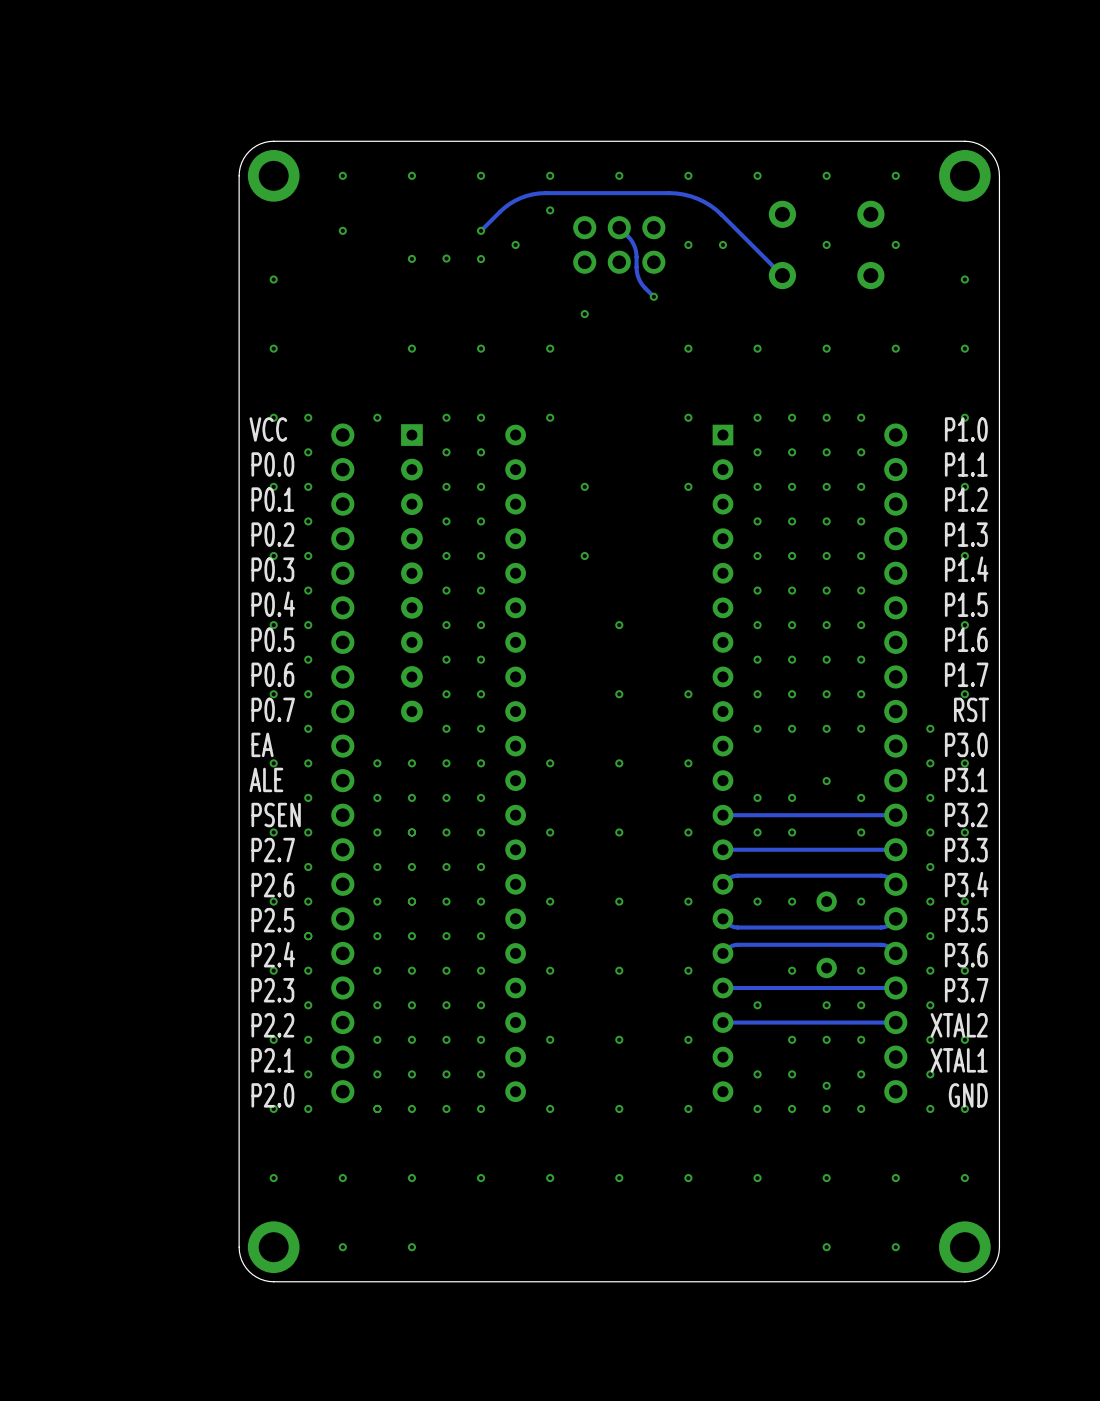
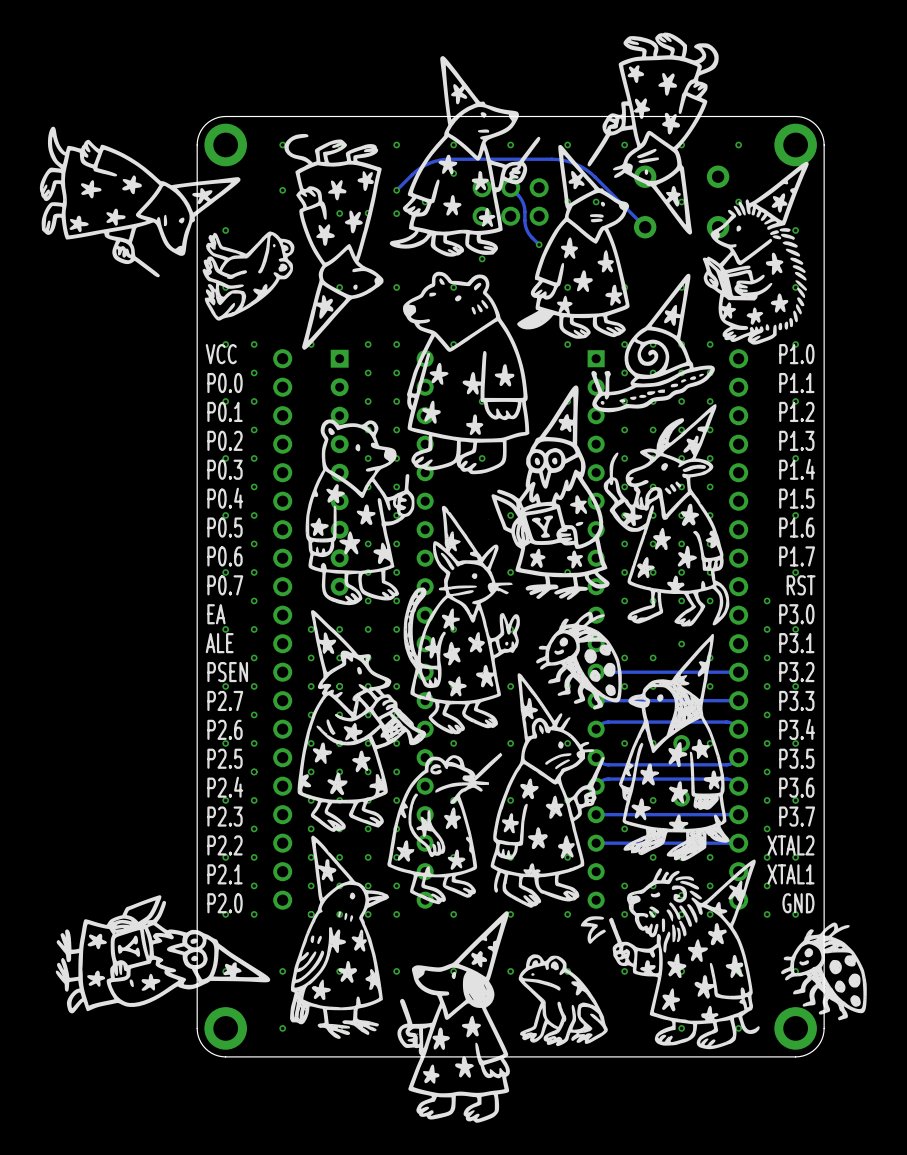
drawing: none -> [39, 32, 809, 1123]
drawing: none -> [55, 895, 271, 1014]
drawing: none -> [781, 922, 867, 1021]

